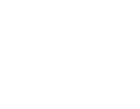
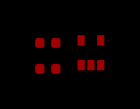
part: none -> (47, 42)
part: none -> (90, 52)
part: none -> (47, 68)

